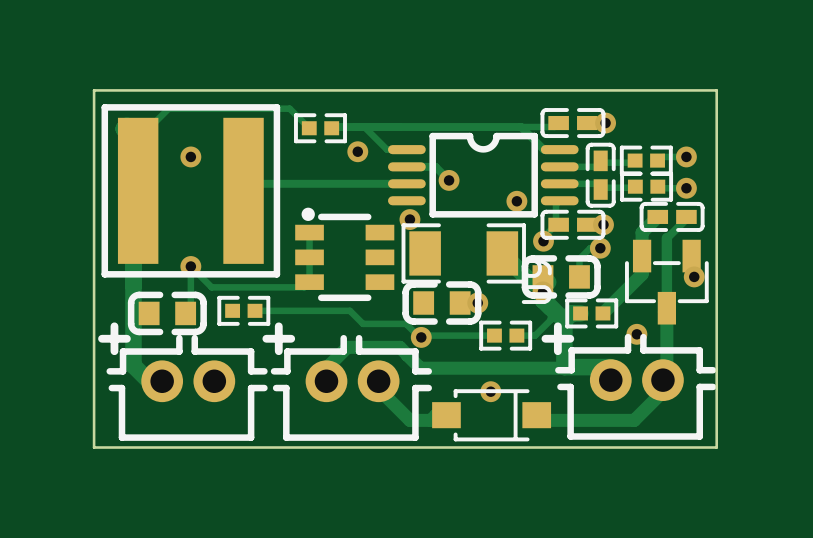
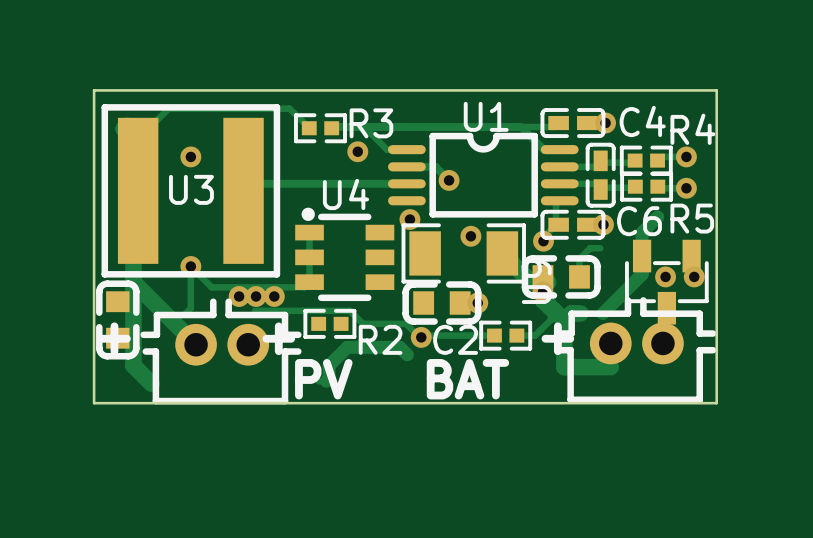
U1 name: none -> U1 (486, 116)
C4 name: none -> C4 (642, 121)
R3 name: none -> R3 (371, 123)
R4 name: none -> R4 (692, 129)
U3 name: none -> U3 (191, 189)
U4 name: none -> U4 (345, 194)
via position: (516, 201) -> (470, 236)
part: (672, 216) -> none
track: (686, 216) (666, 238) (666, 308) (662, 312) (666, 316) (666, 363) (662, 367) -> none
R5 name: none -> R5 (692, 218)
C6 name: none -> C6 (639, 221)
via: (600, 248) -> none
via: none -> (665, 276)
track: none -> (133, 282) (196, 344)
via: none -> (239, 296)
via: none -> (256, 296)
via: none -> (274, 296)
part: (243, 310) -> none
part rotation: 0° (167, 313) -> 90° clockwise (117, 319)
part position: (167, 313) -> (117, 319)
part: (591, 313) -> none
R2: none -> (329, 323)
via: (636, 334) -> none
C2 name: none -> C2 (455, 339)
track: (407, 355) (420, 368) (598, 368) (610, 380) -> none
text: none -> PV (323, 379)
text: none -> BAT (467, 379)
track: (662, 380) (662, 391) (634, 420) (531, 420) -> none
track: (378, 381) (378, 389) (409, 420) (430, 420) (436, 415) (446, 415) -> none
part position: (635, 386) -> (635, 350)
part position: (187, 387) -> (220, 351)
part: (351, 387) -> none
via: (490, 391) -> none
board edge: (94, 403) (94, 447) (716, 447) (716, 403) -> (94, 403) (716, 403)
part: (491, 415) -> none

